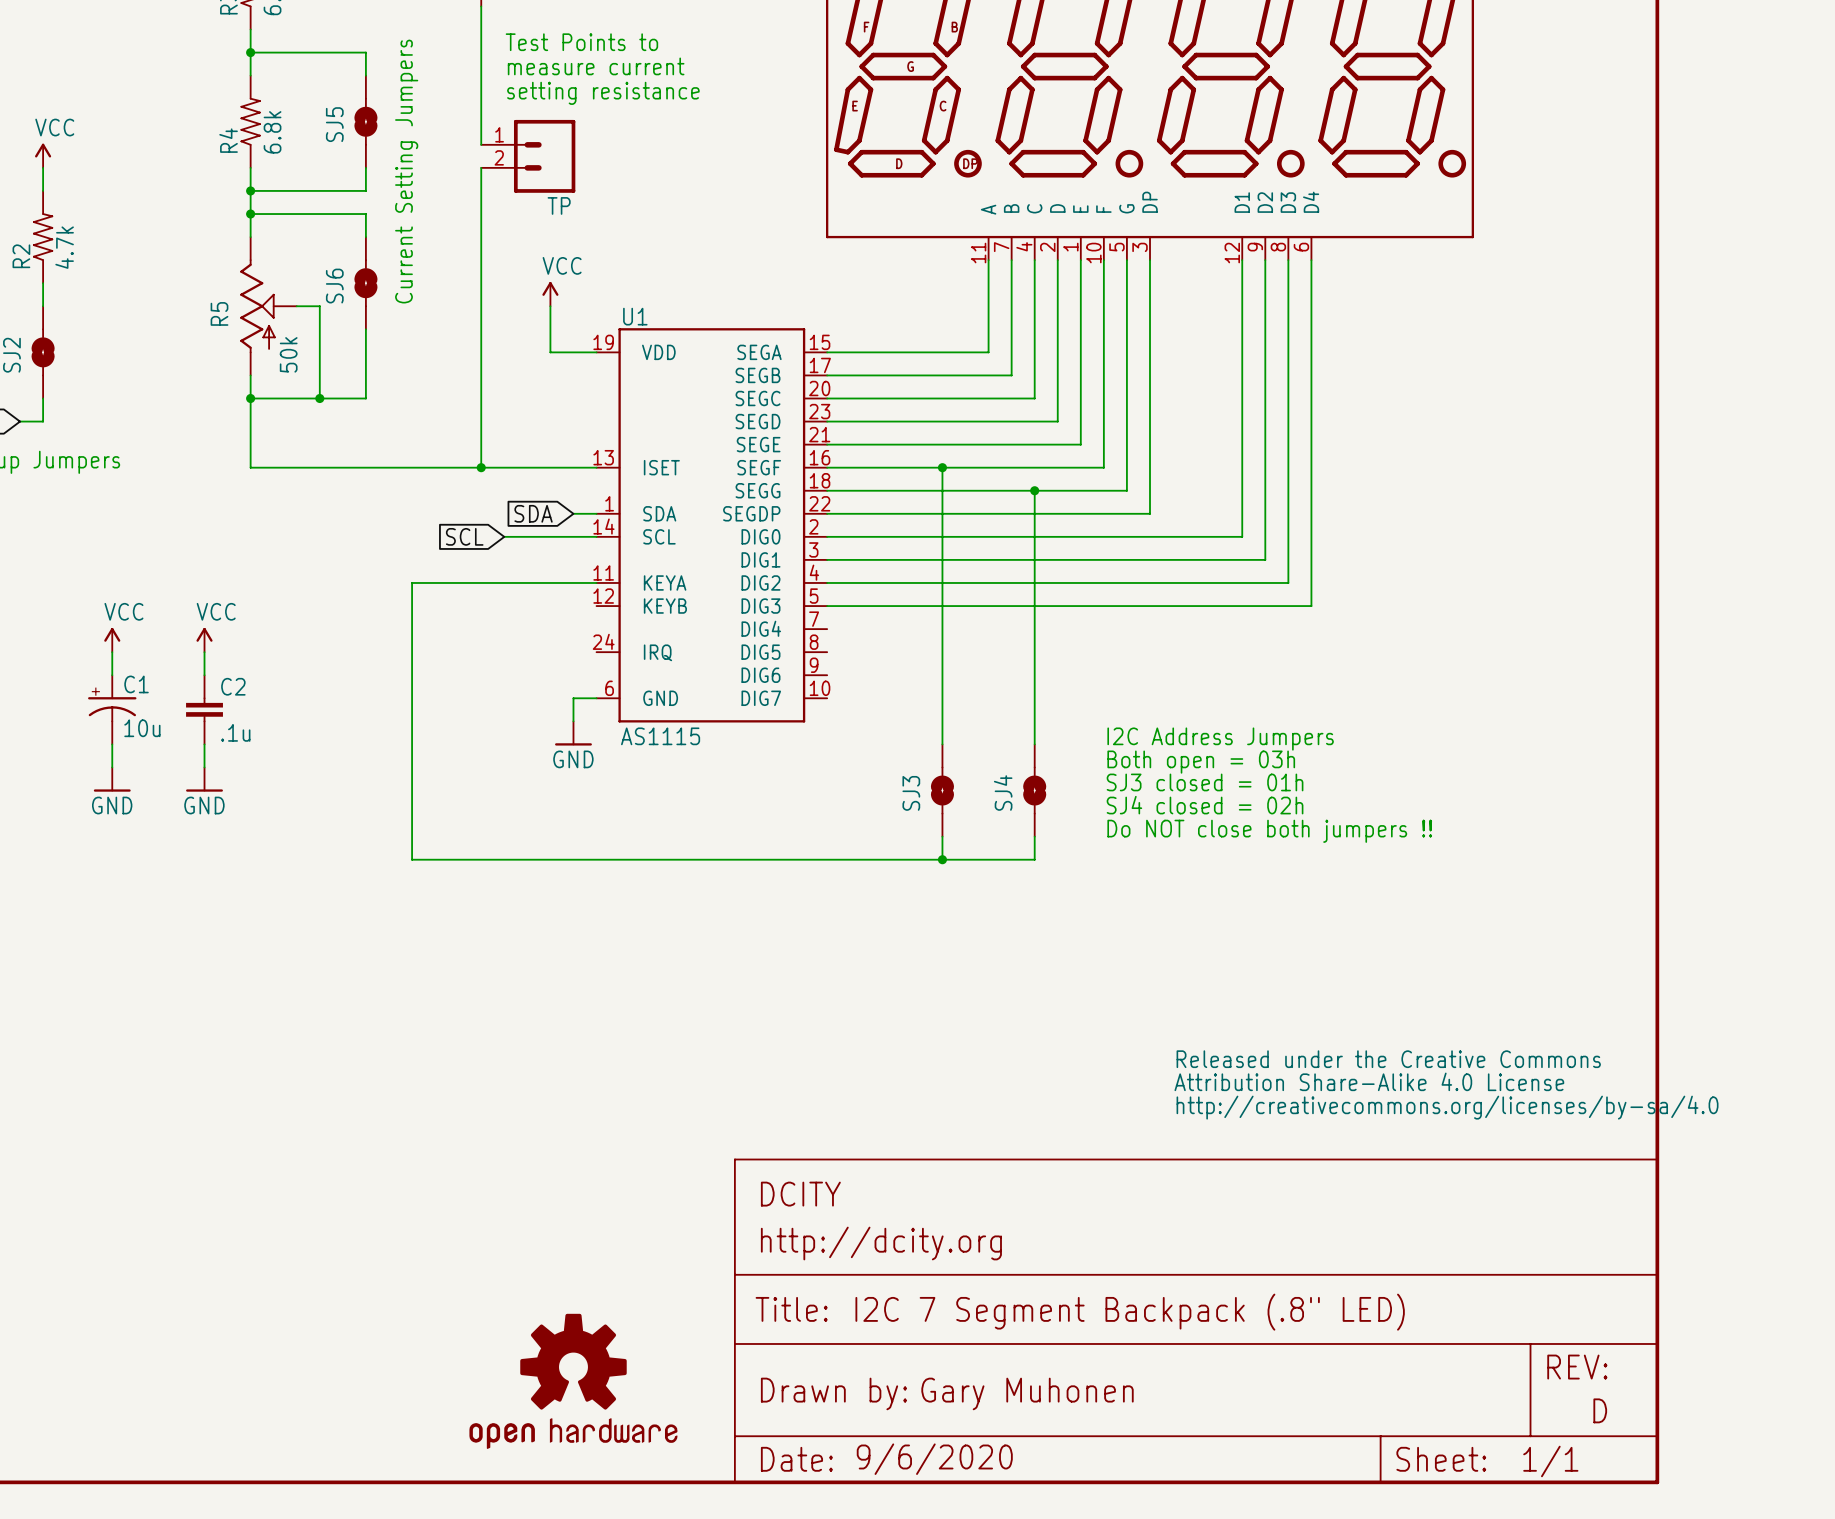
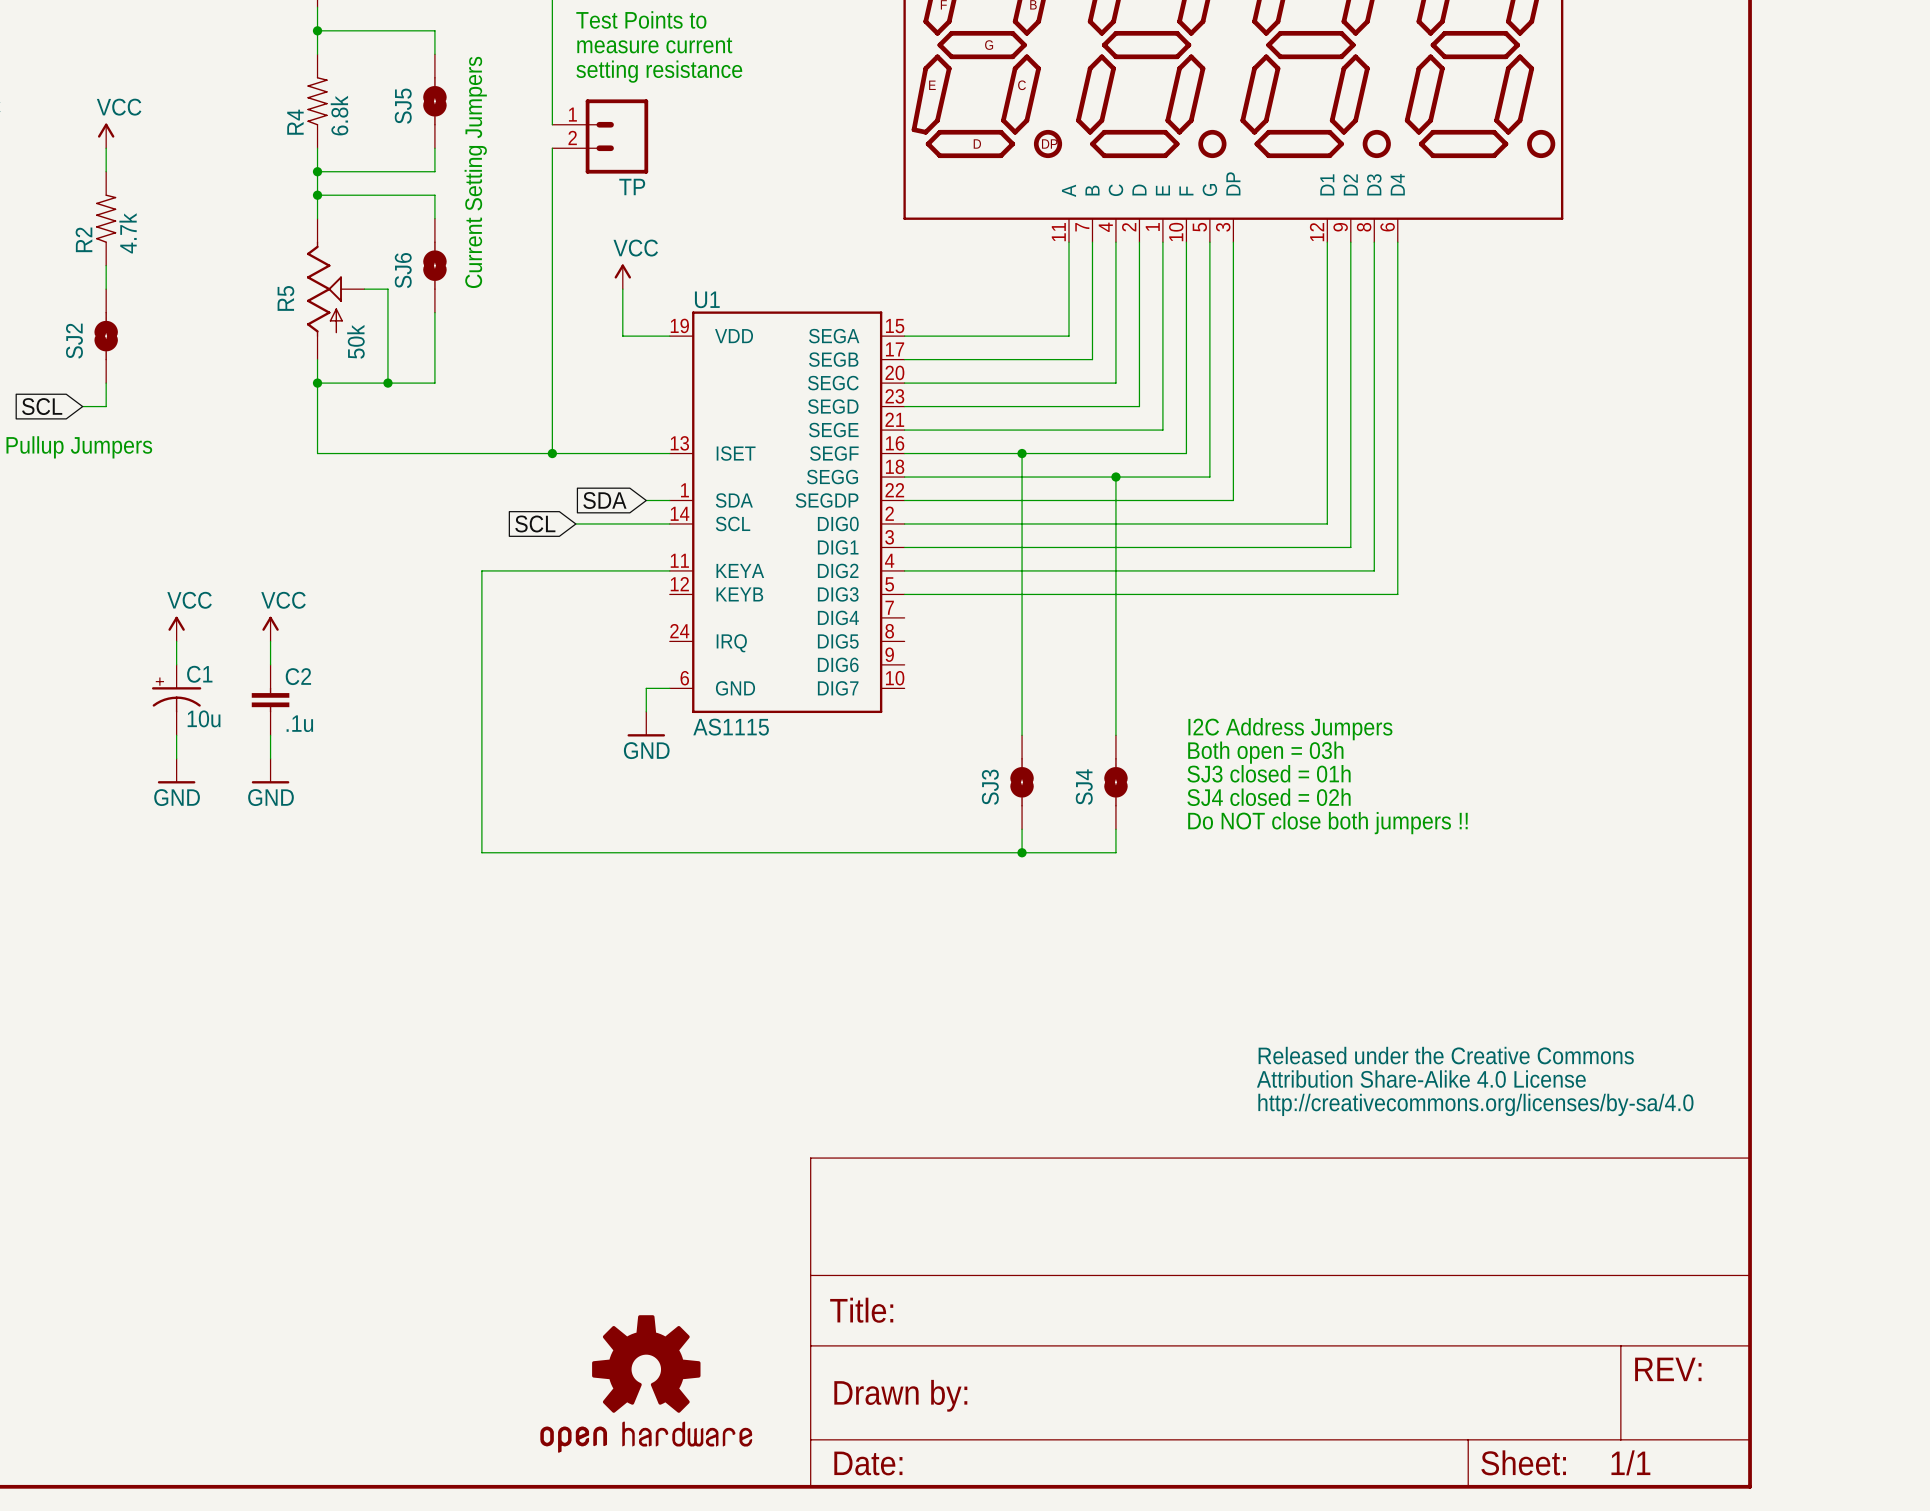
part text: DCITY (800, 1194) -> none
part text: http://dcity.org (881, 1243) -> none
part text: I2C 7 Segment Backpack (.8" LED) (1130, 1312) -> none
part text: Gary Muhonen (1027, 1393) -> none
part text: D (1600, 1410) -> none
part text: 9/6/2020 (934, 1459) -> none

